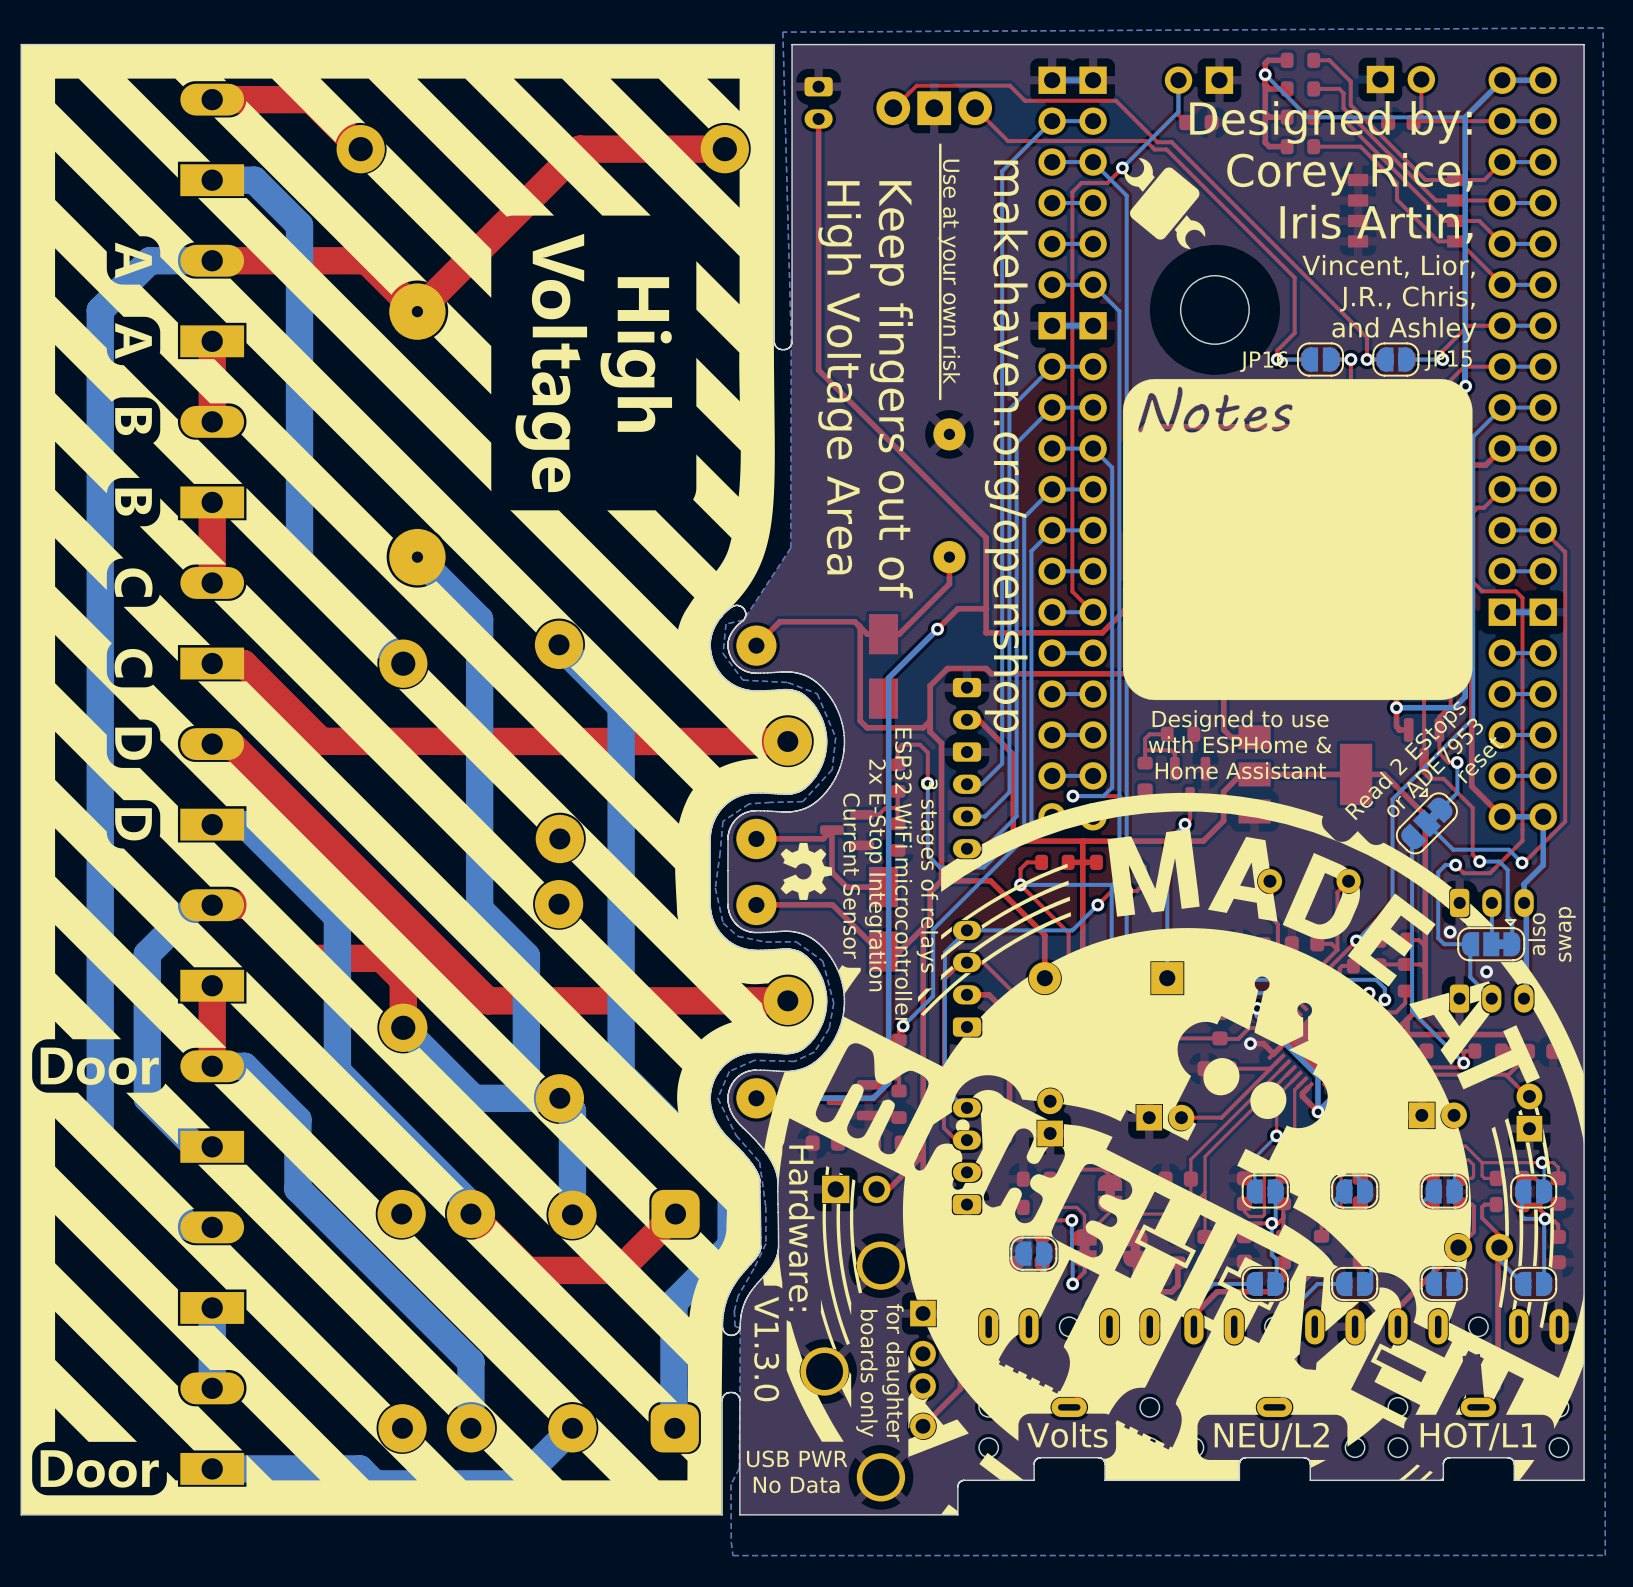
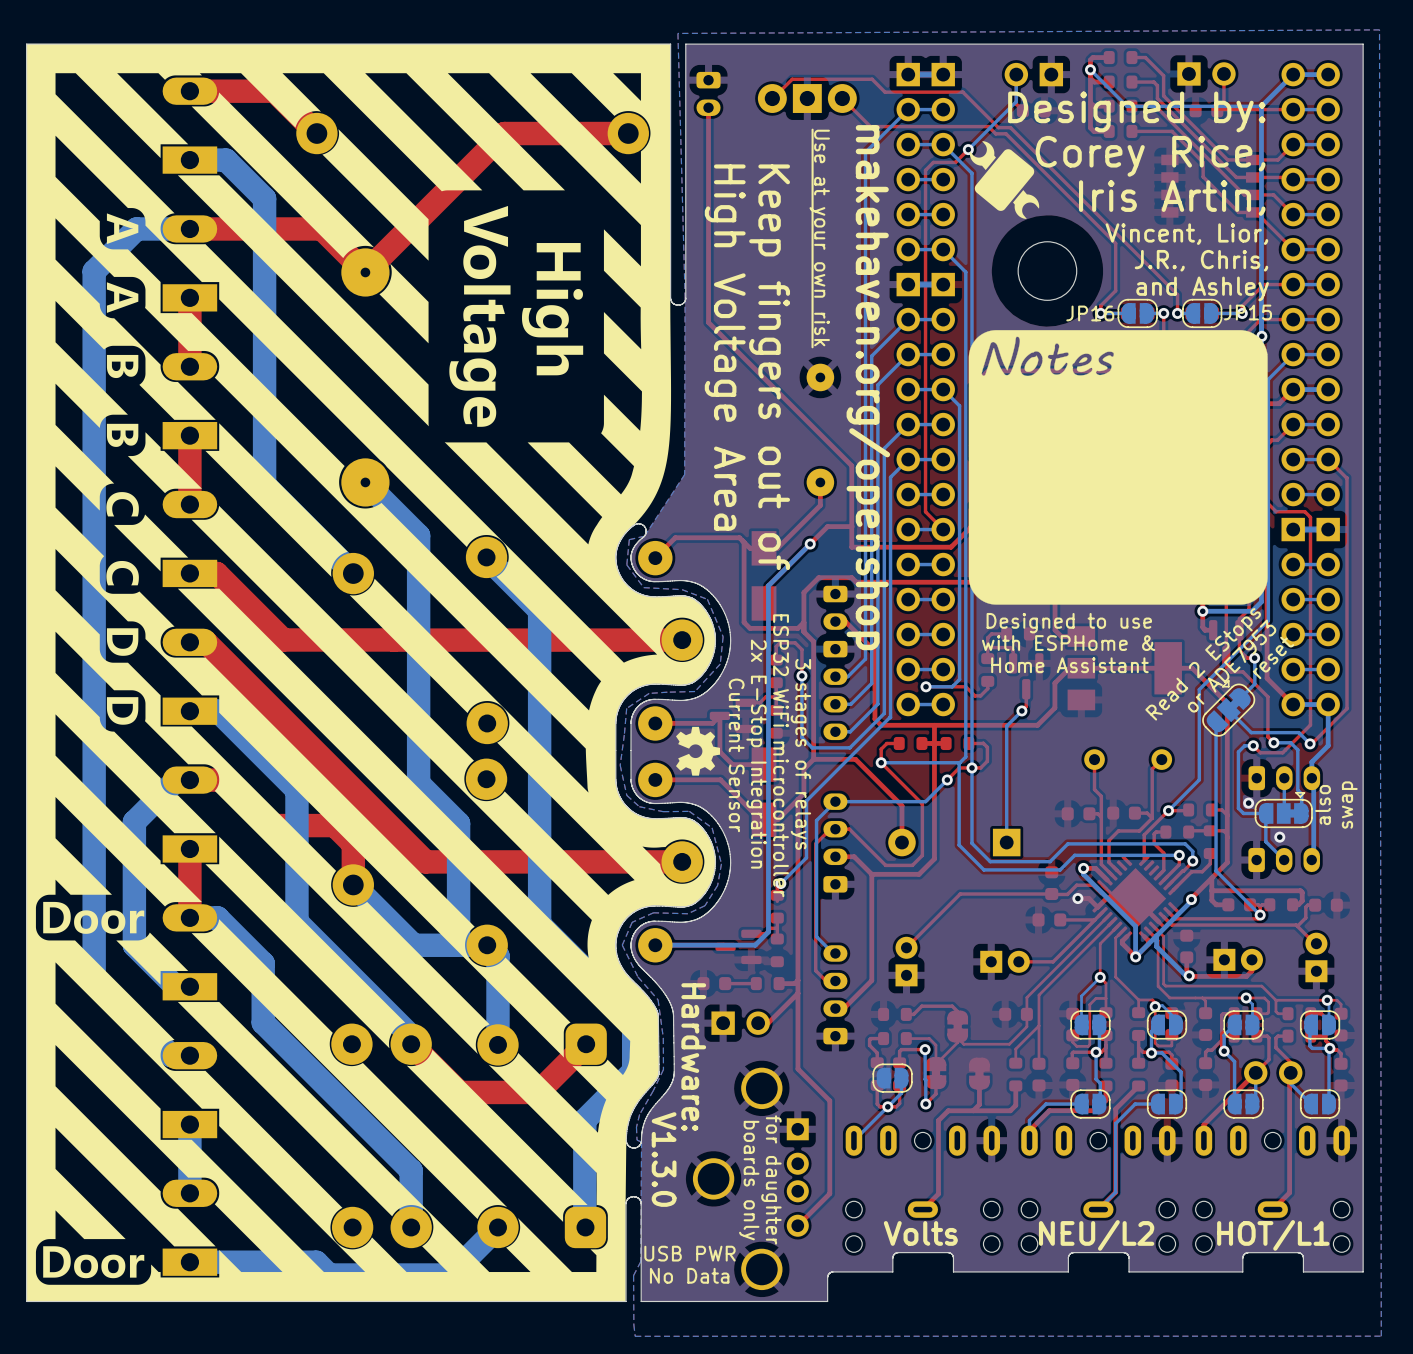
drawing: [763, 792, 1585, 1481] -> none
drawing: [940, 1504, 958, 1515] -> none

